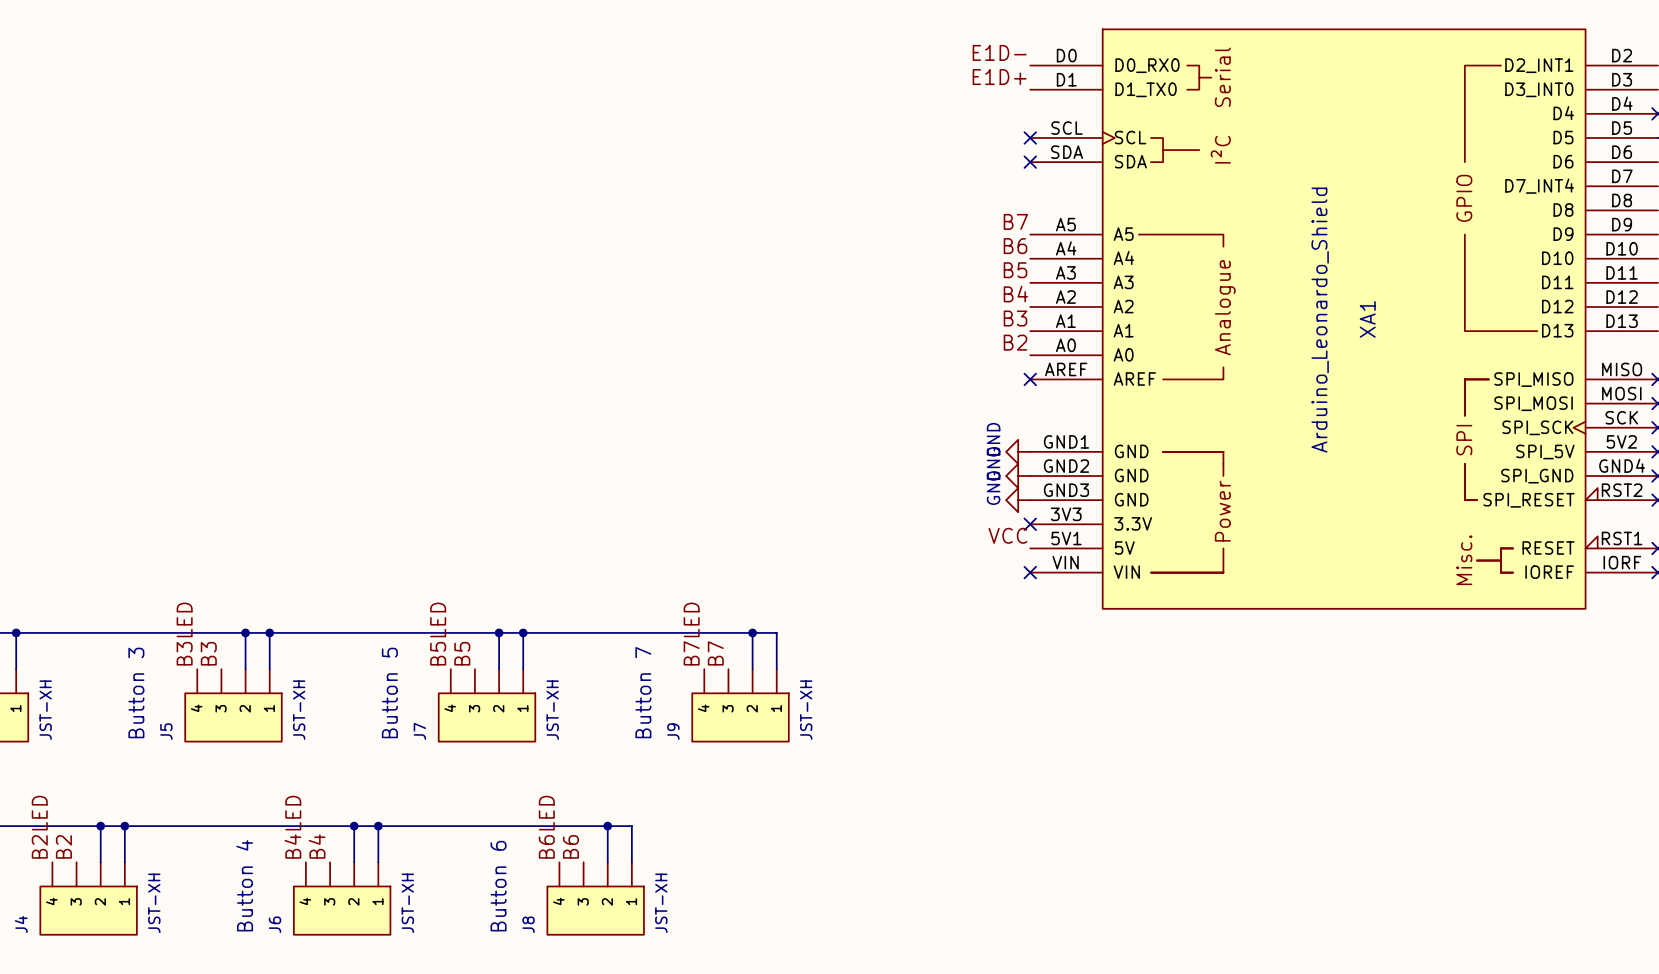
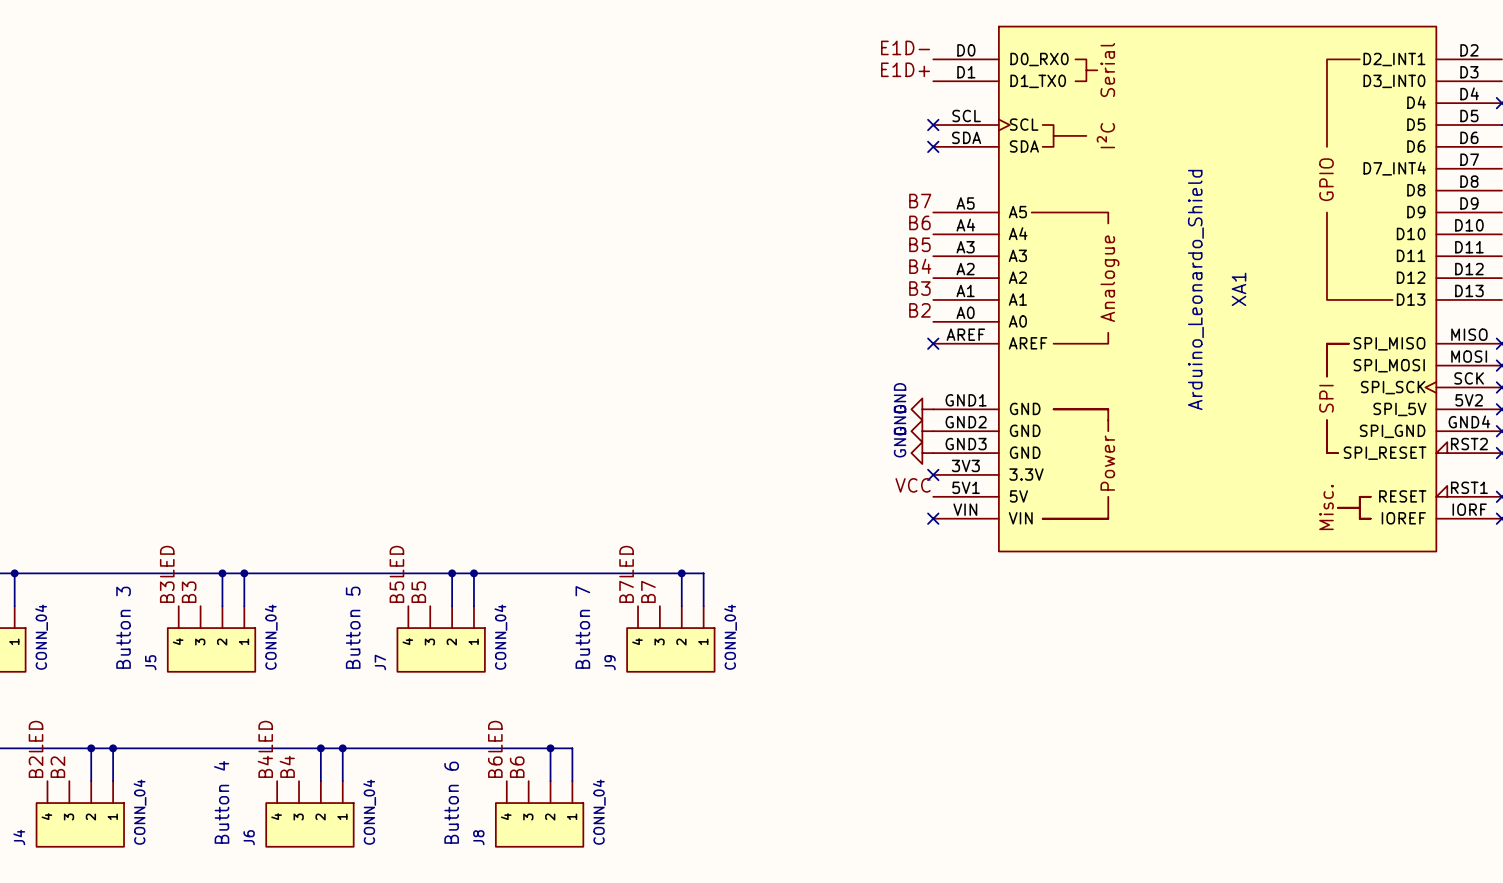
part value: JST-XH (45, 710) -> CONN_04 (41, 637)
J5 value: JST-XH (299, 710) -> CONN_04 (271, 637)
J7 value: JST-XH (552, 710) -> CONN_04 (500, 637)
J9 value: JST-XH (806, 710) -> CONN_04 (730, 637)
J4 value: JST-XH (154, 903) -> CONN_04 (140, 812)
J6 value: JST-XH (407, 903) -> CONN_04 (369, 812)
J8 value: JST-XH (661, 903) -> CONN_04 (599, 812)

